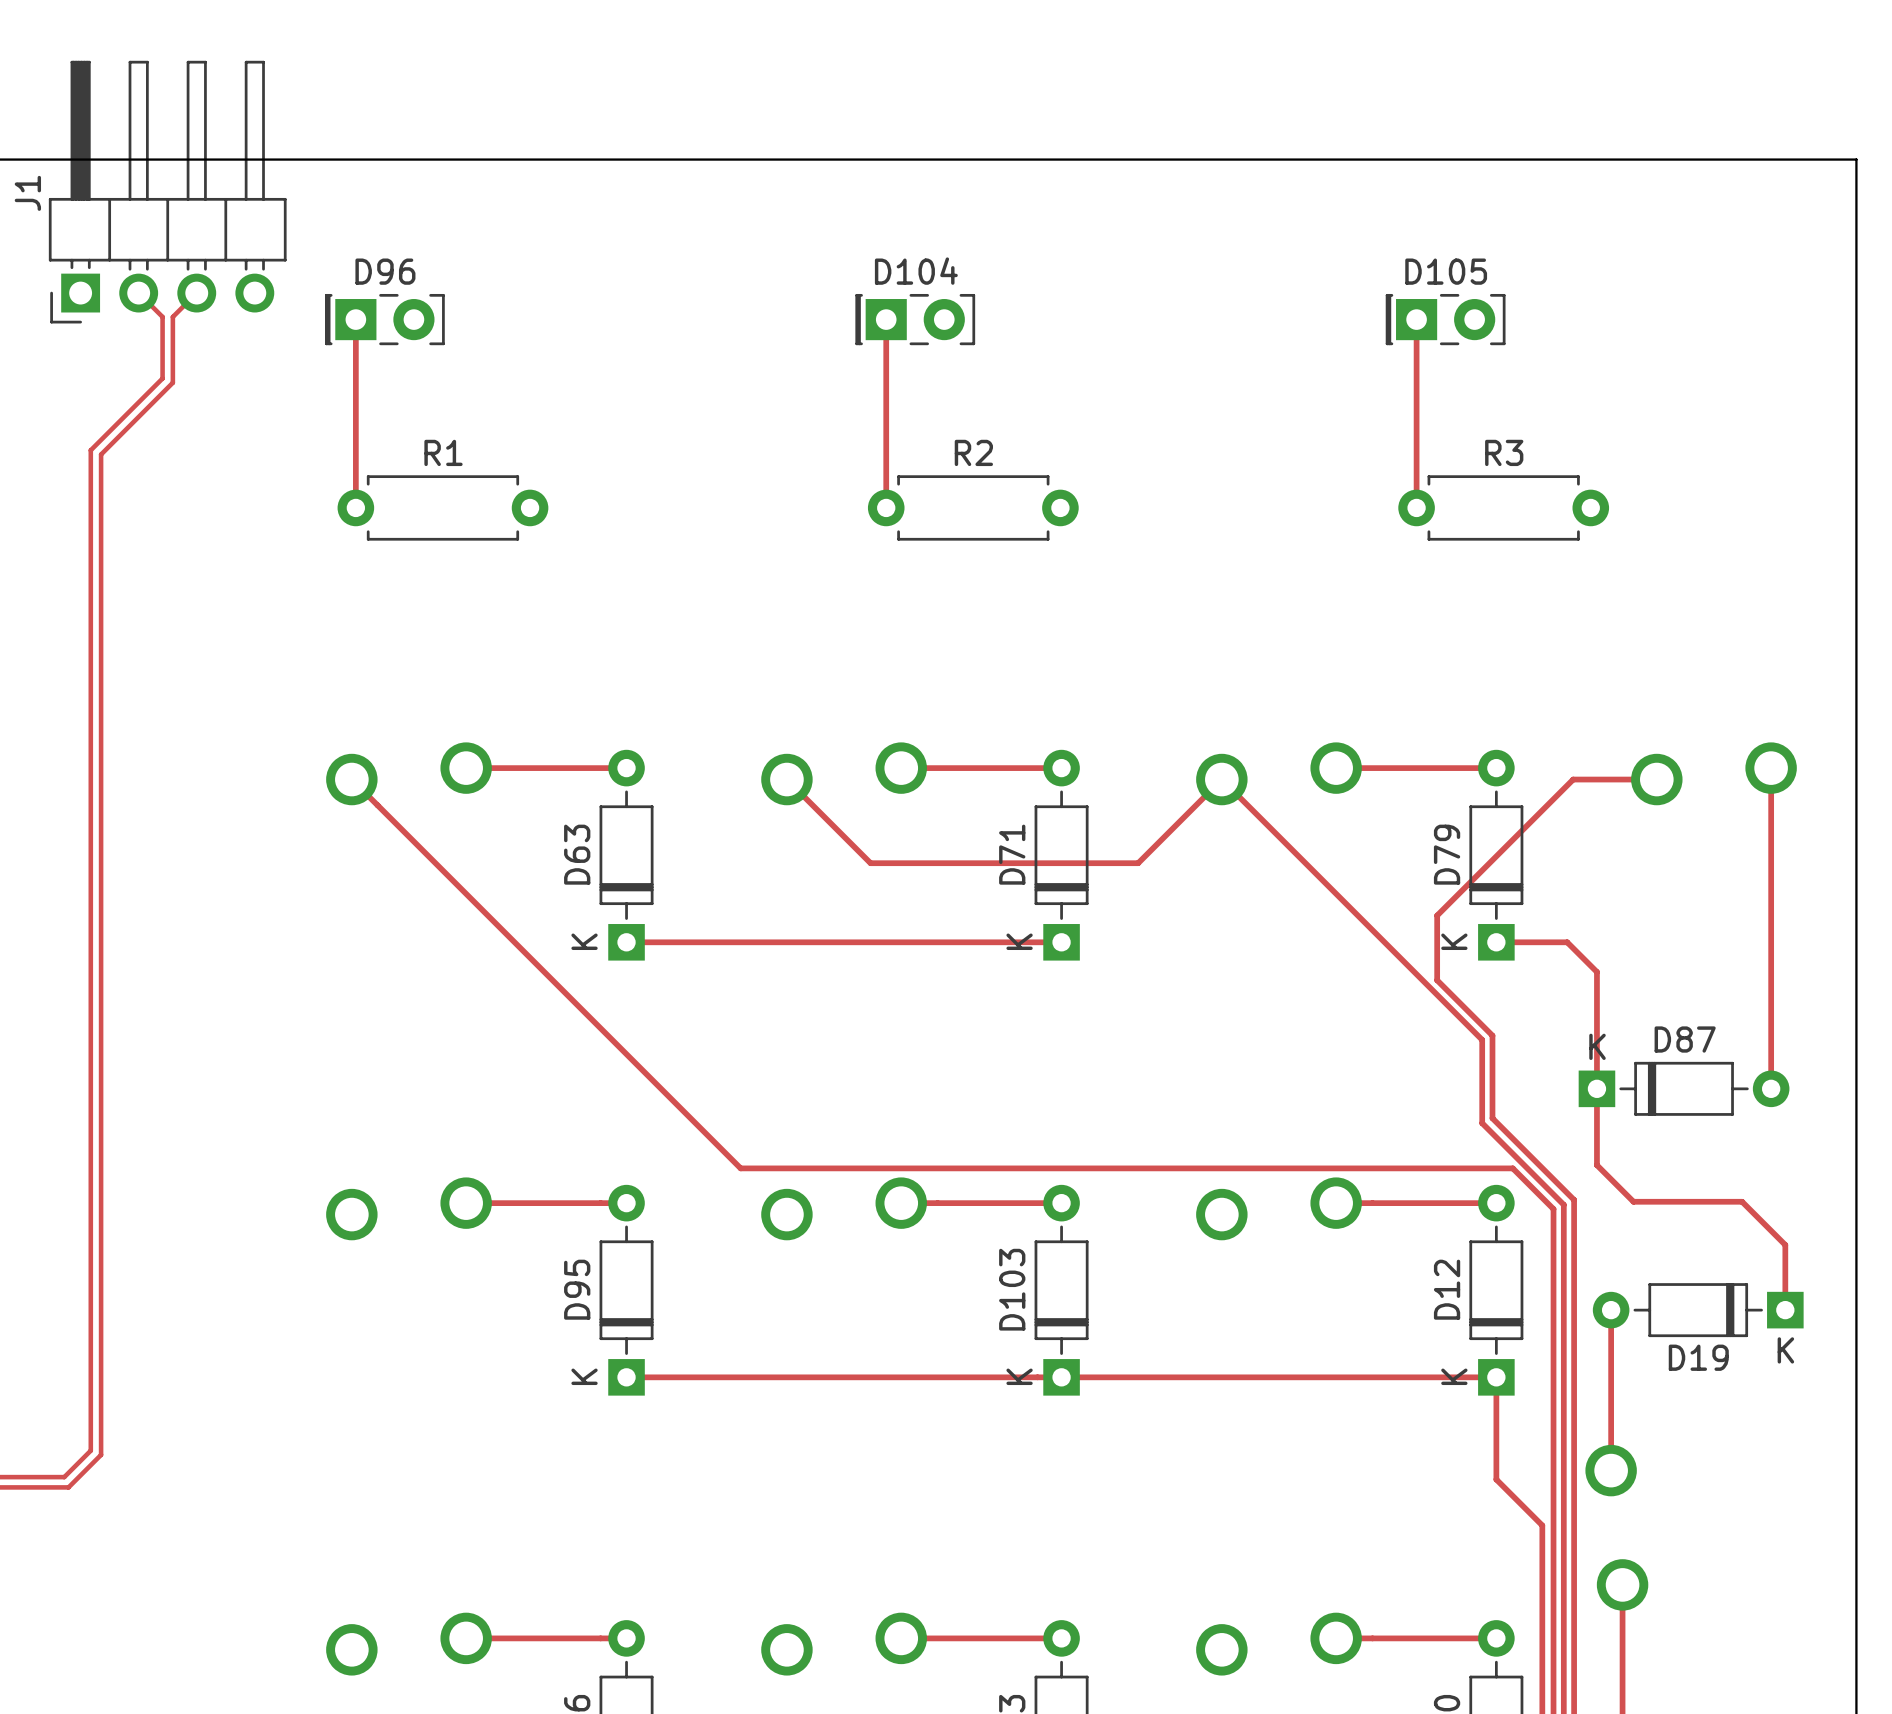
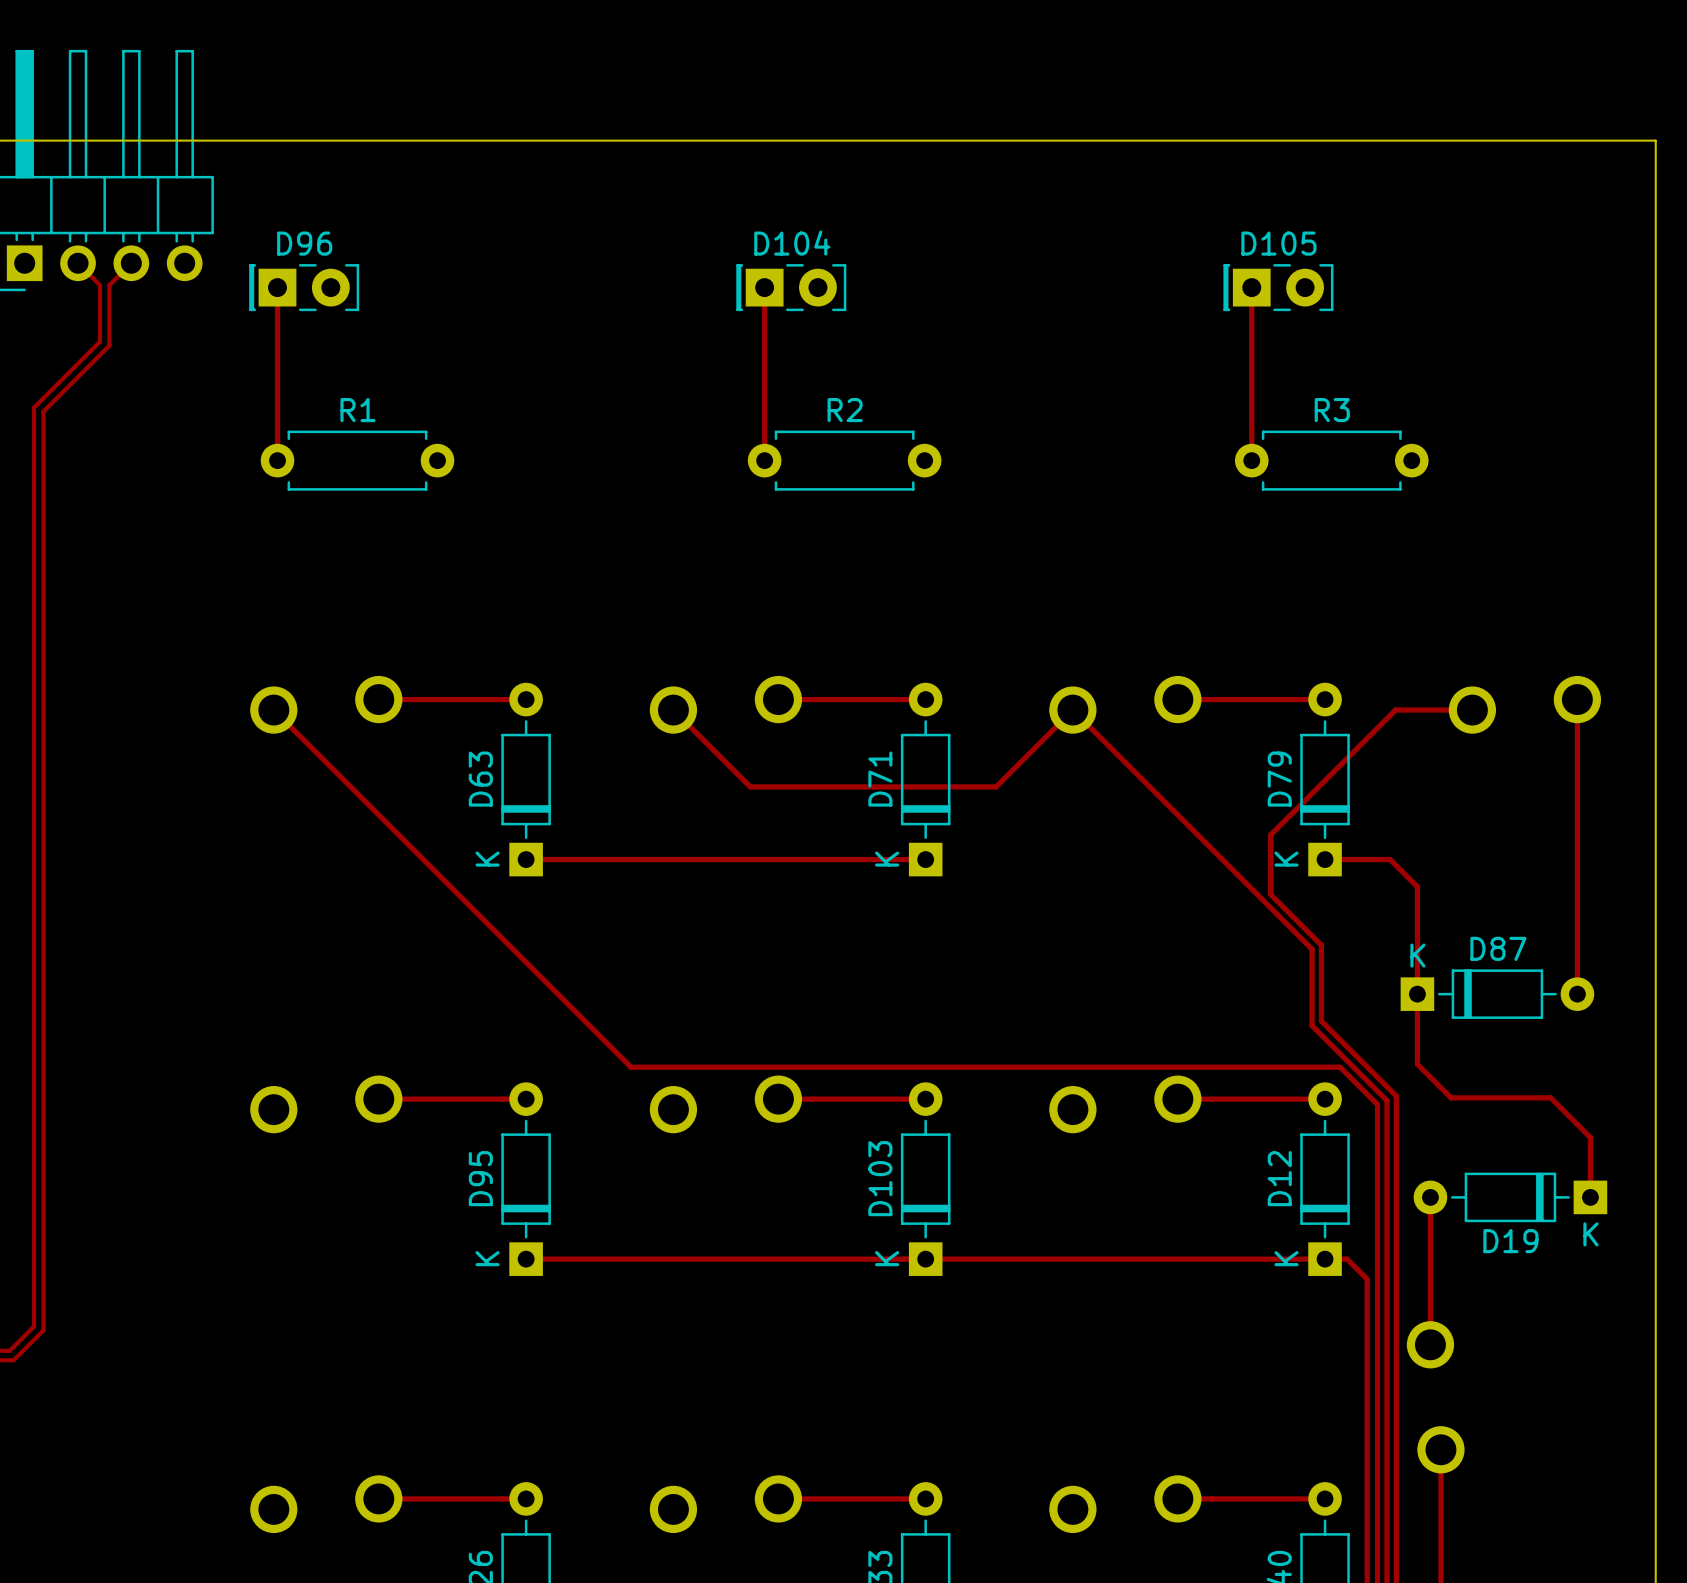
track: (1496, 1377) (1496, 1479) (1542, 1525) -> (1325, 1259) (1347, 1259) (1367, 1279) (1367, 1395)

